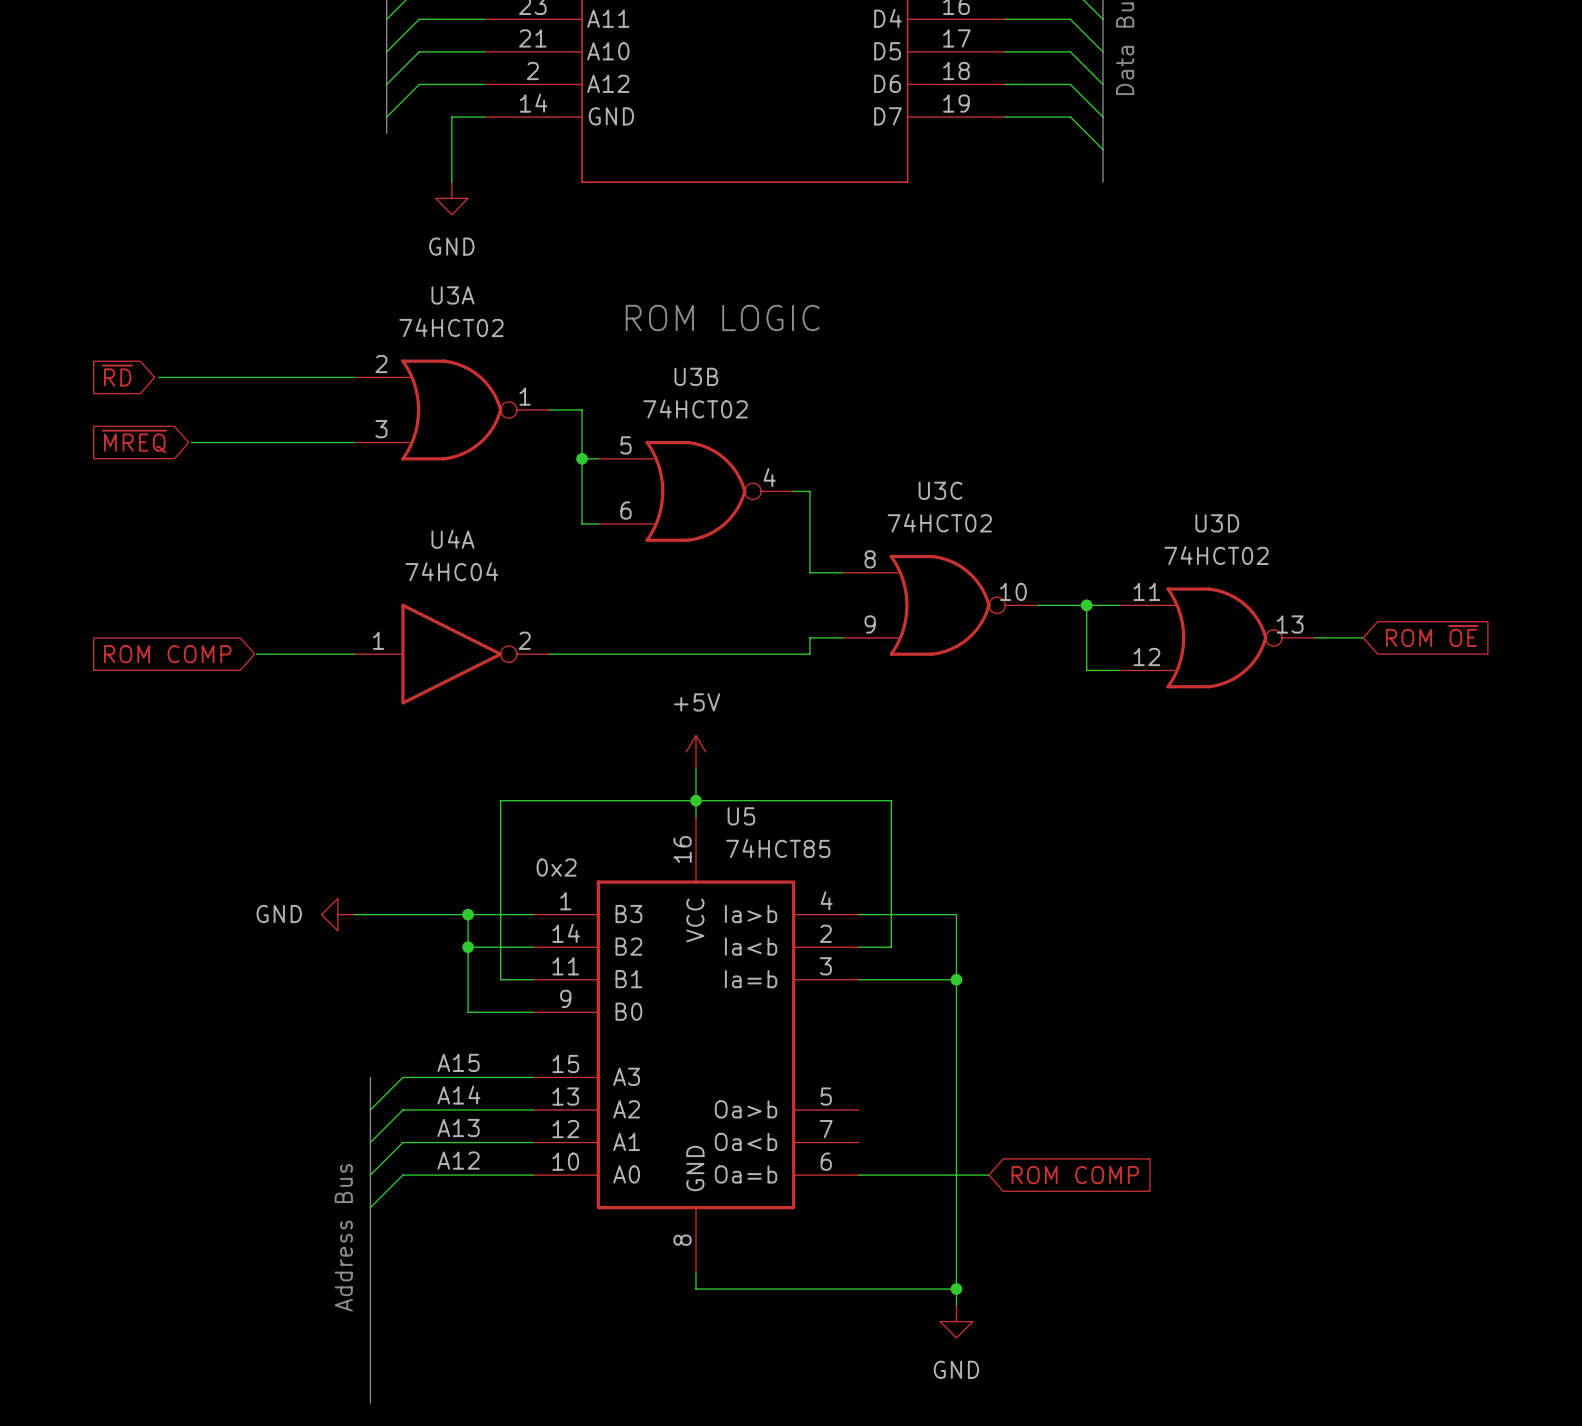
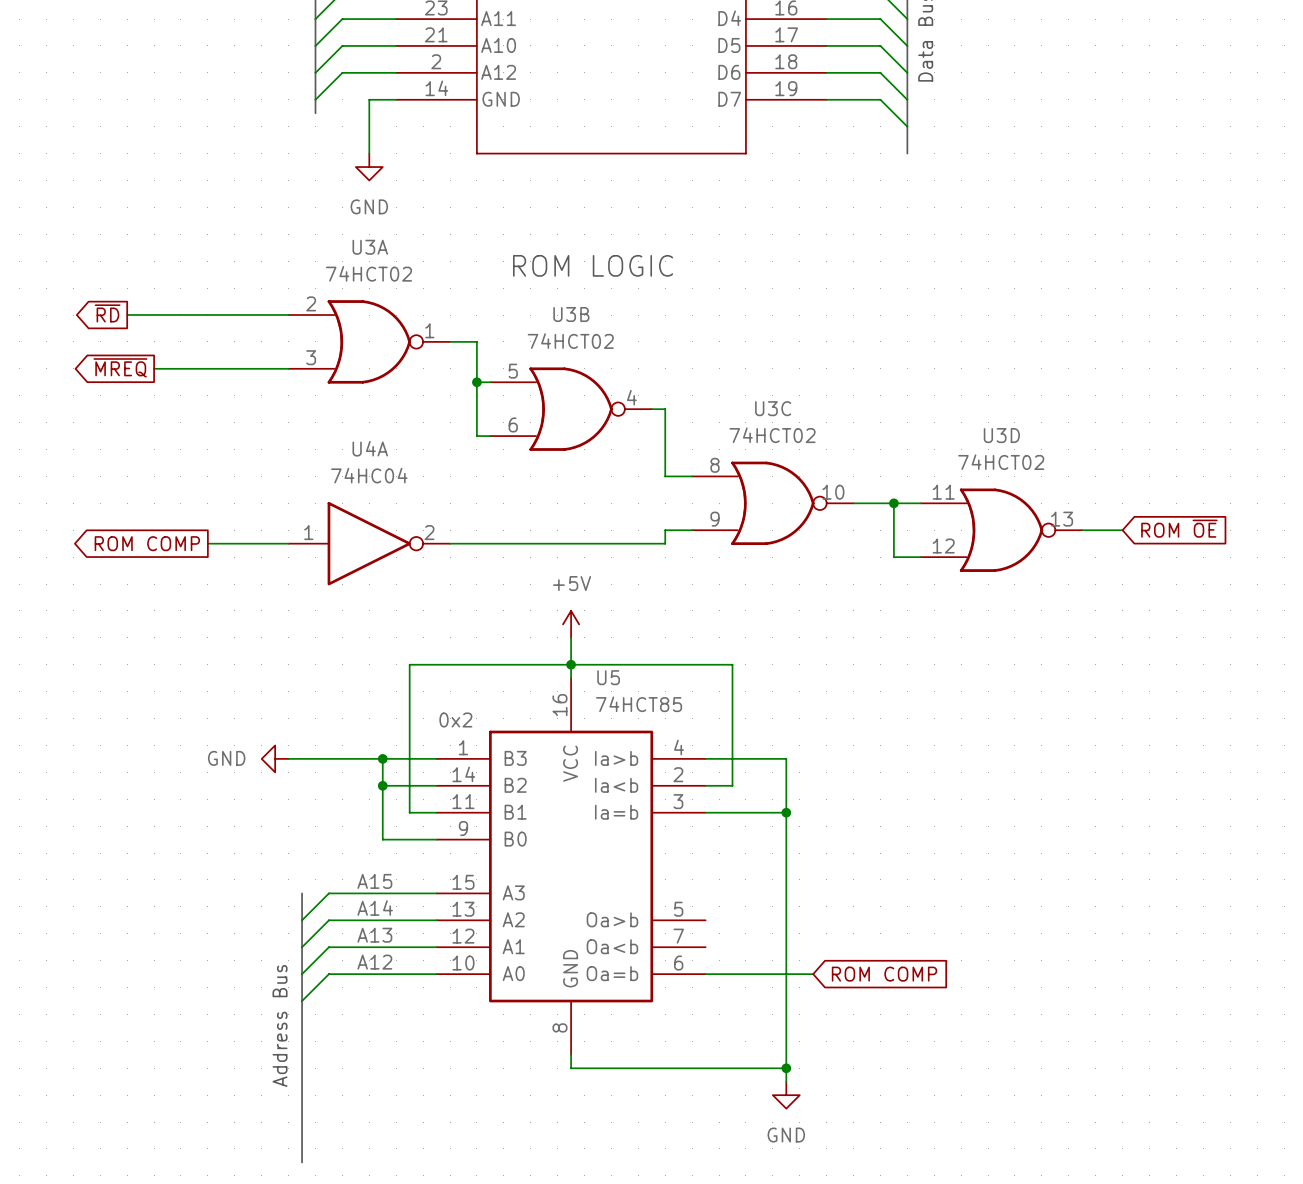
global label rotation: 0° (117, 375) -> 180° (107, 313)
global label rotation: 0° (134, 441) -> 180° (120, 367)
global label rotation: 0° (167, 654) -> 180° (147, 543)

